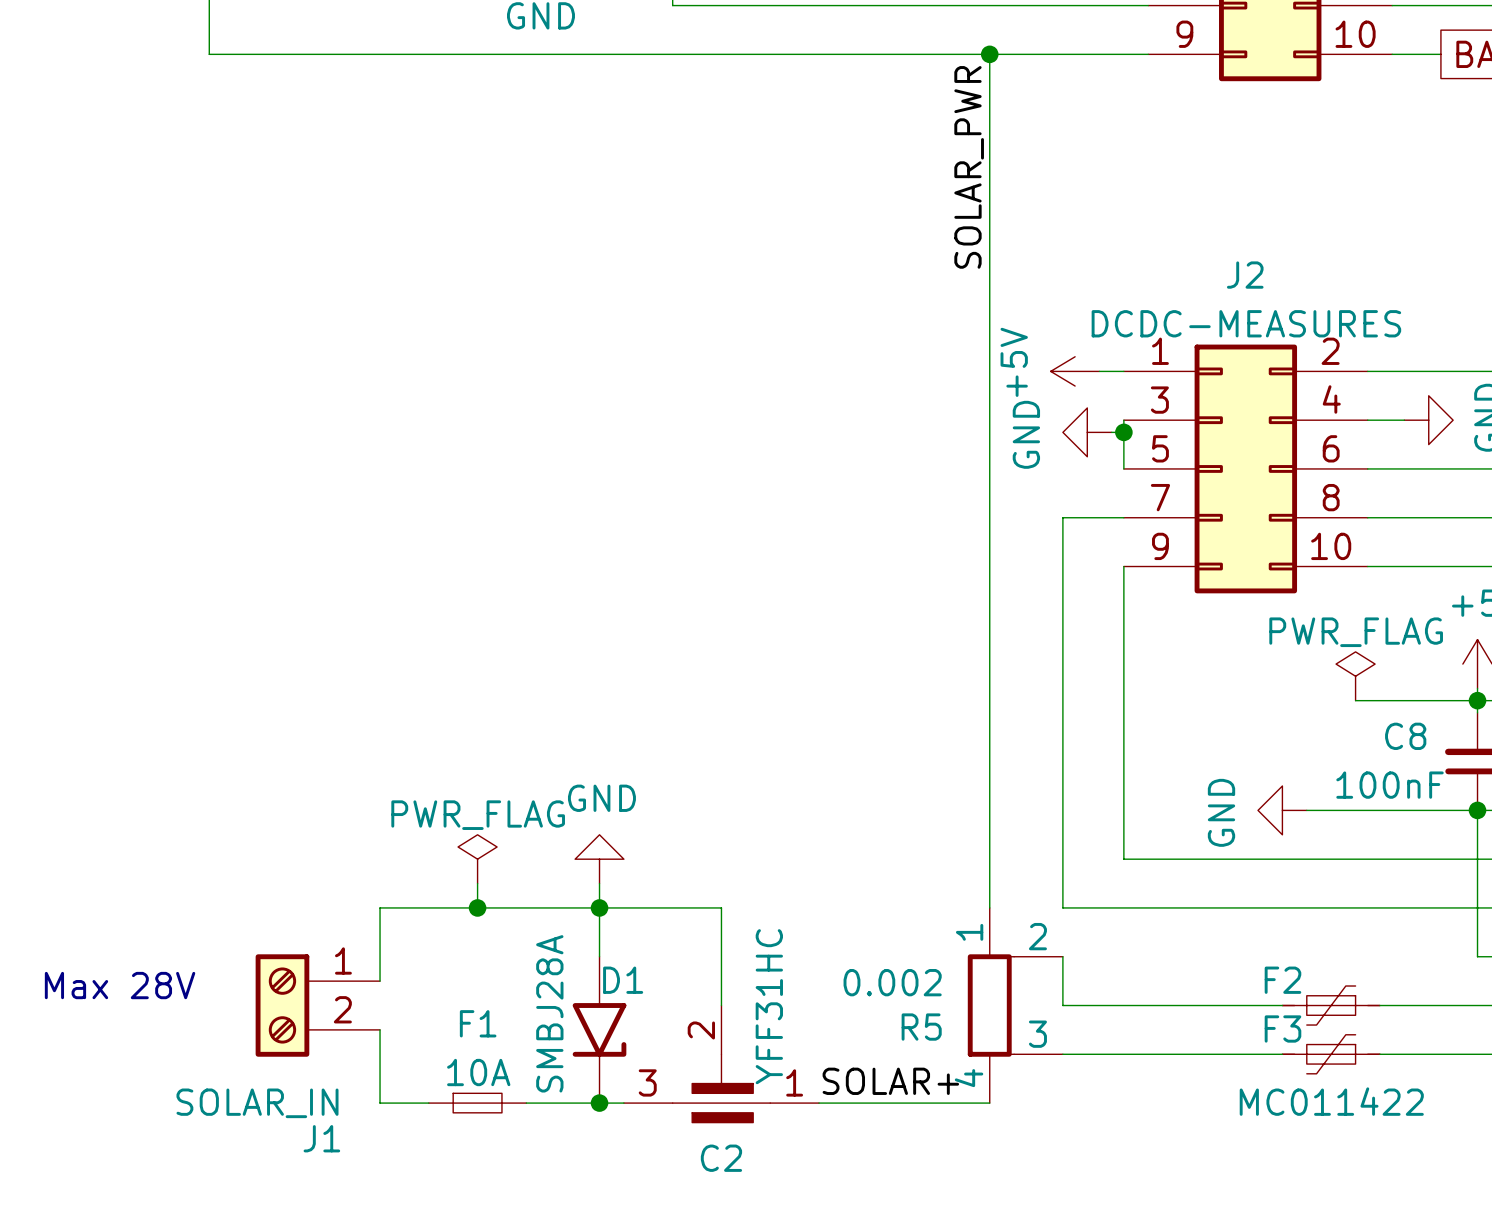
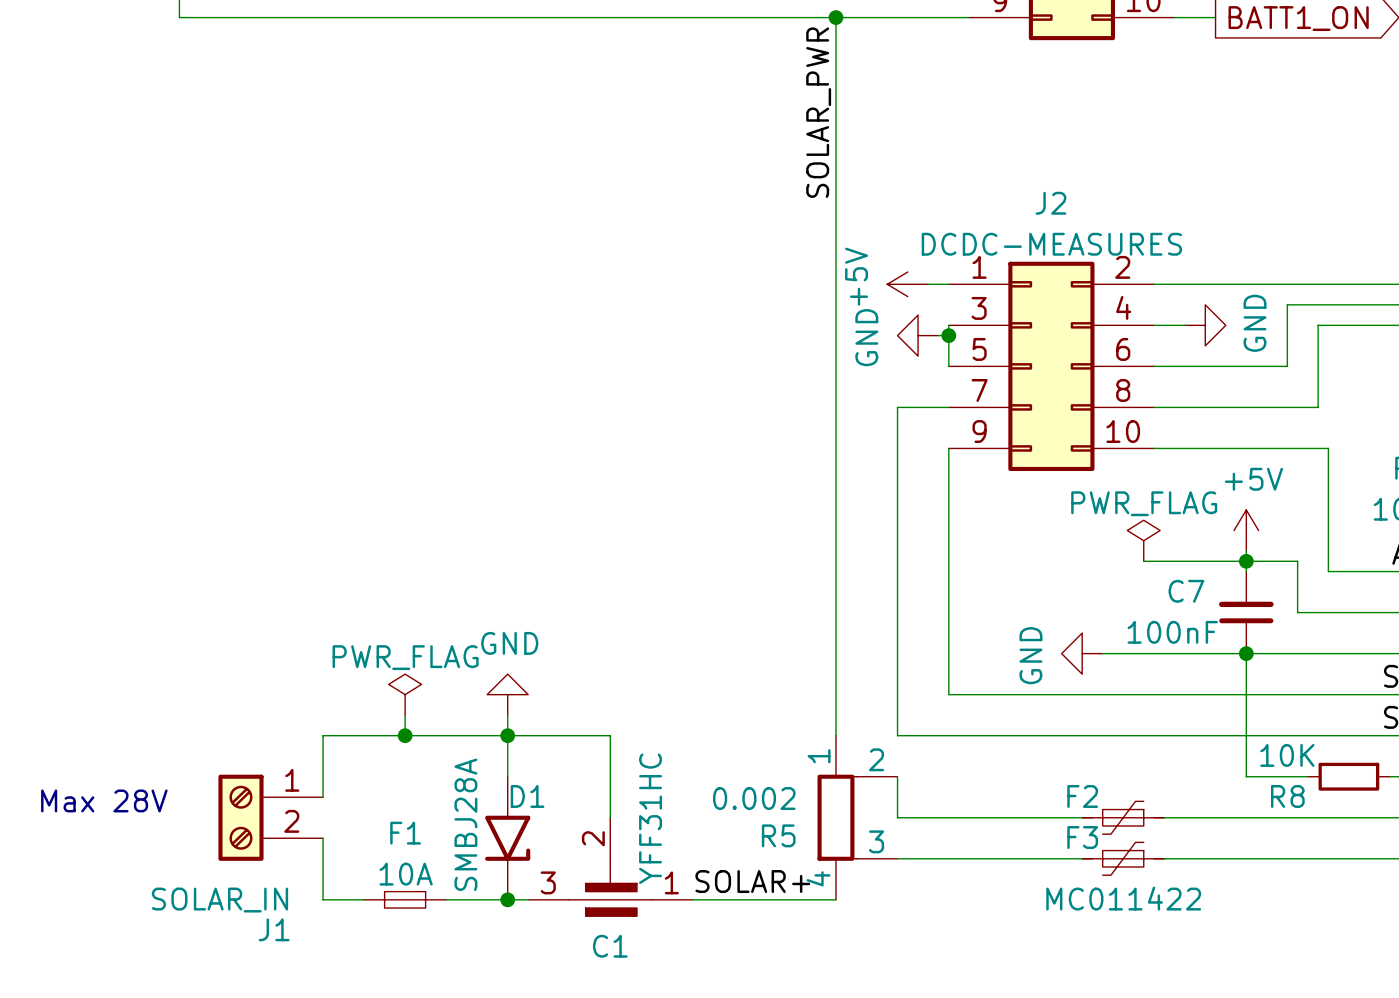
C8 name: C8 (1405, 736) -> C7 (1186, 591)
C2 name: C2 (721, 1158) -> C1 (610, 946)

